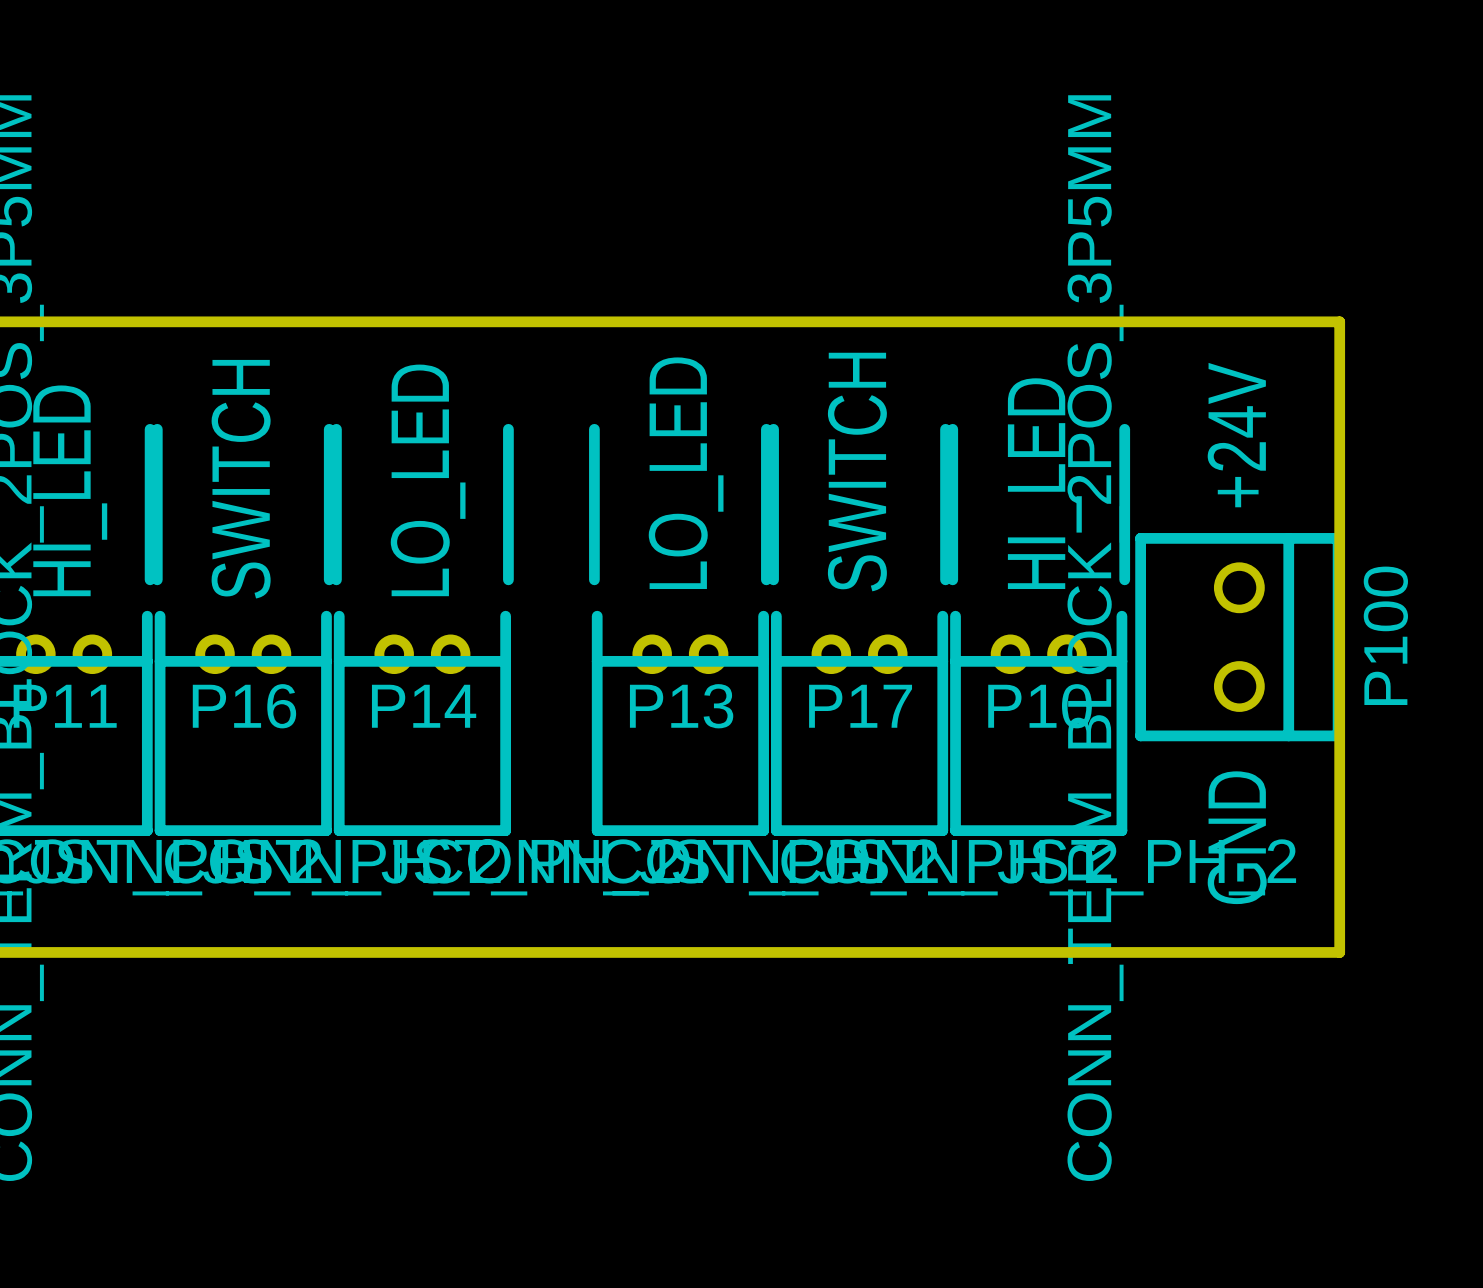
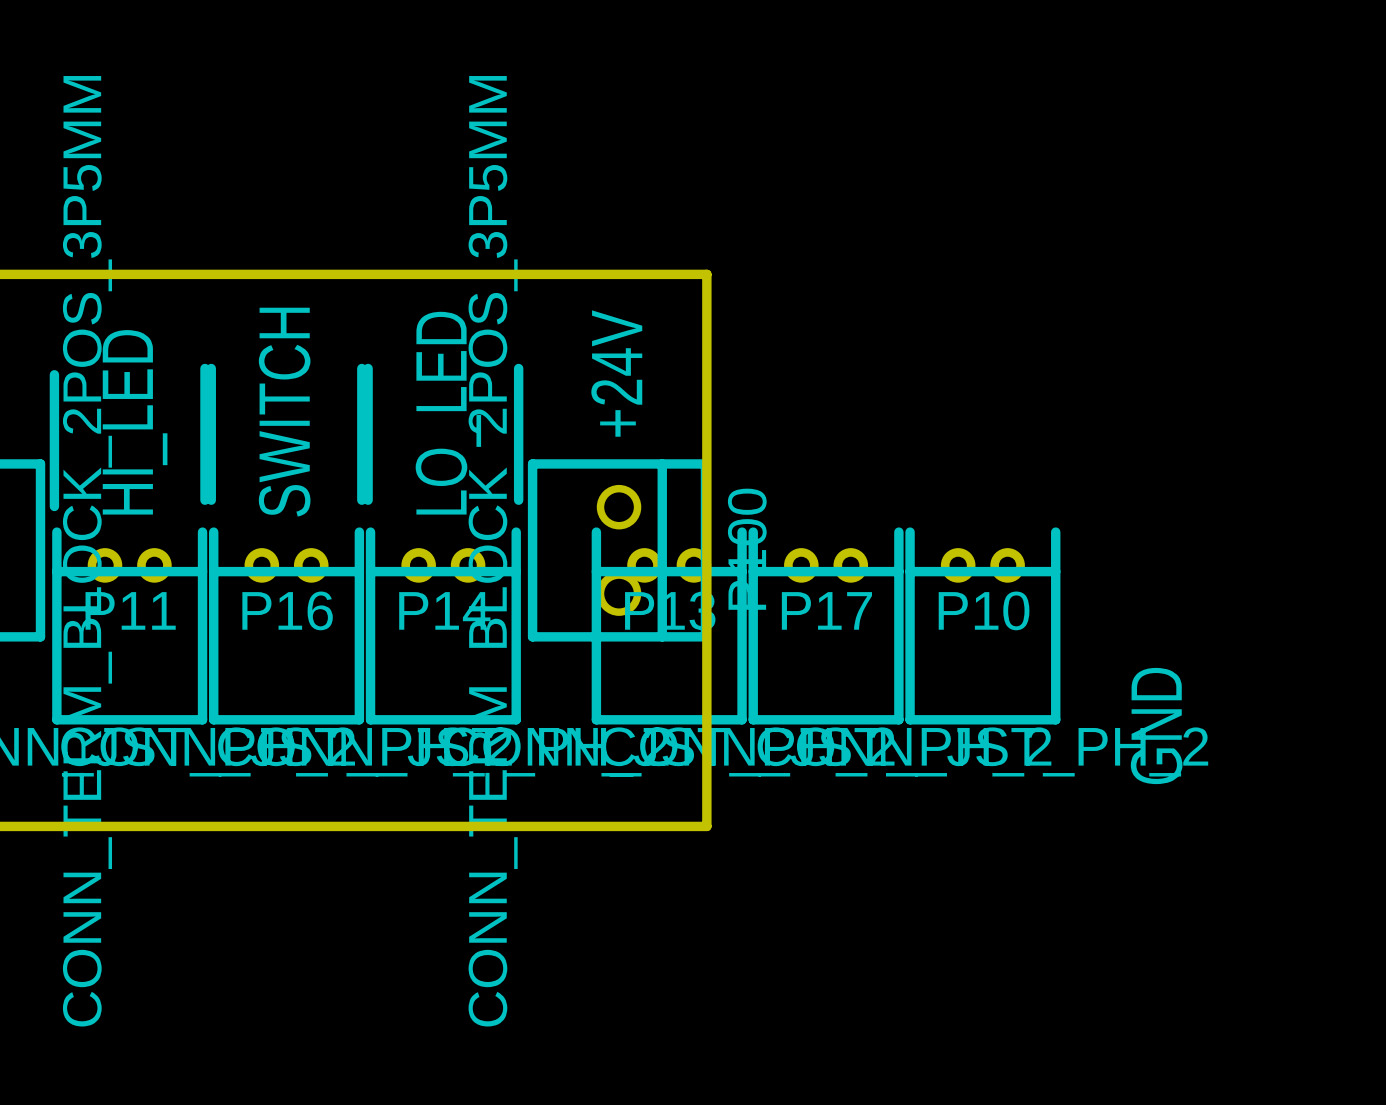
board edge: (723, 321) (1339, 321) (1339, 952) (723, 952) -> (706, 274) (706, 826)
line: (594, 429) (594, 579) -> none
line: (766, 429) (766, 579) -> none
line: (773, 429) (773, 579) -> none
line: (945, 429) (945, 579) -> none
line: (952, 429) (952, 579) -> none
line: (1124, 429) (1124, 579) -> none
text position: +24V (1236, 435) -> +24V (616, 373)
text: SWITCH (857, 472) -> none
text: LO_LED (686, 473) -> none
text: HI_LED (1044, 483) -> none
P100 position: (1239, 637) -> (619, 550)

